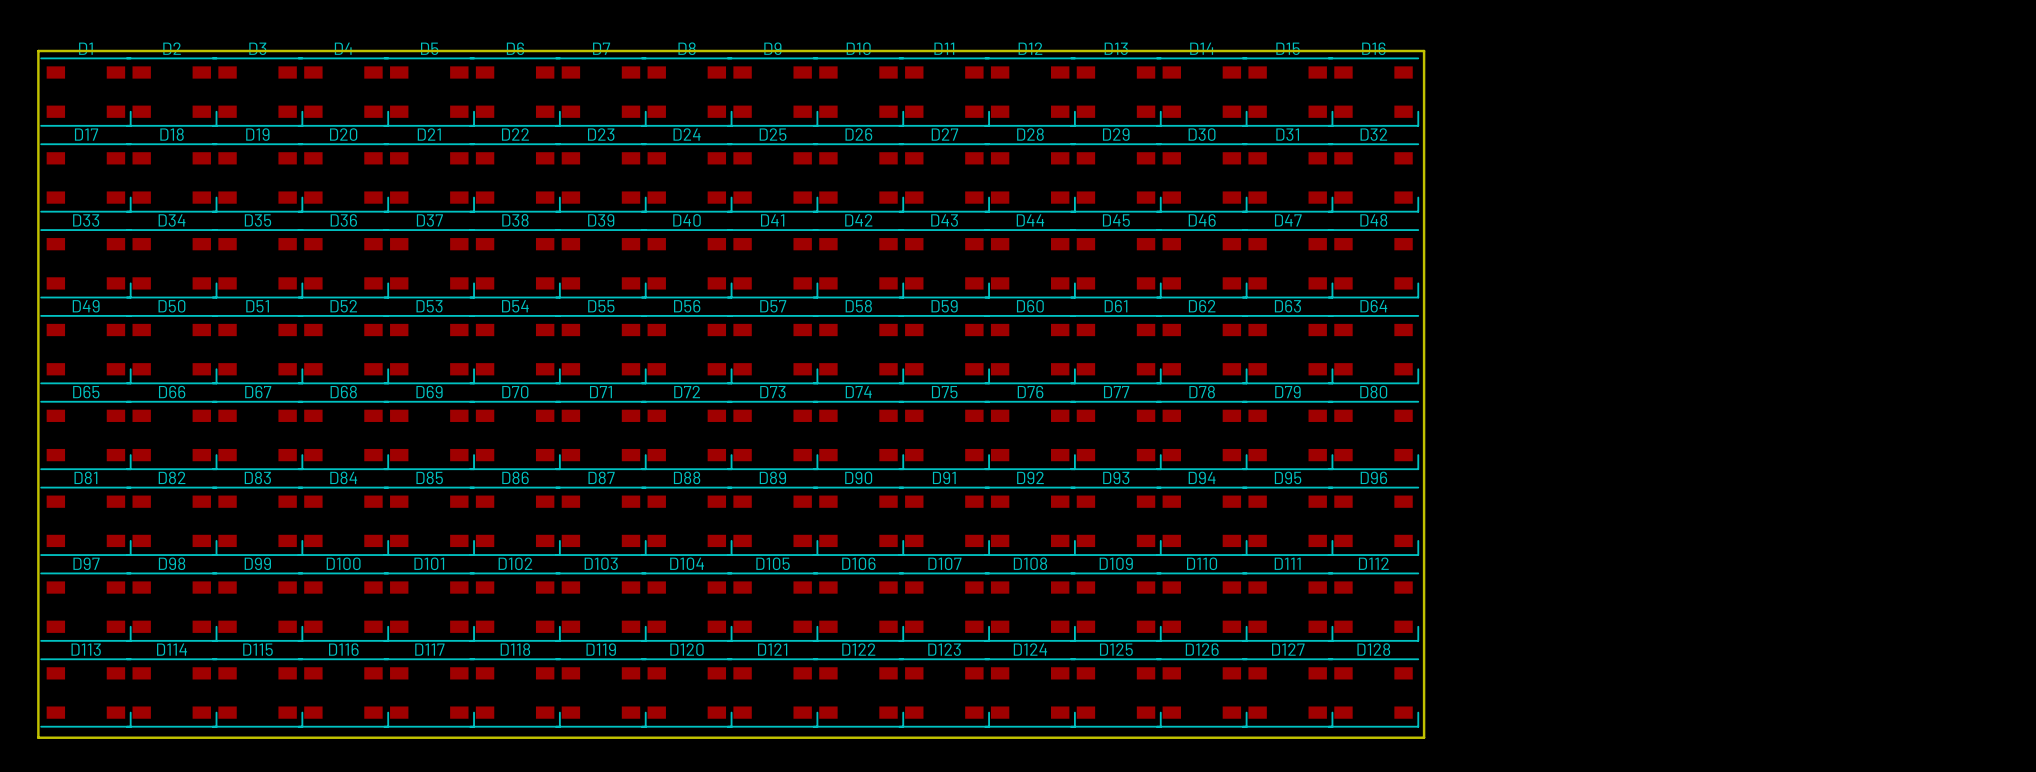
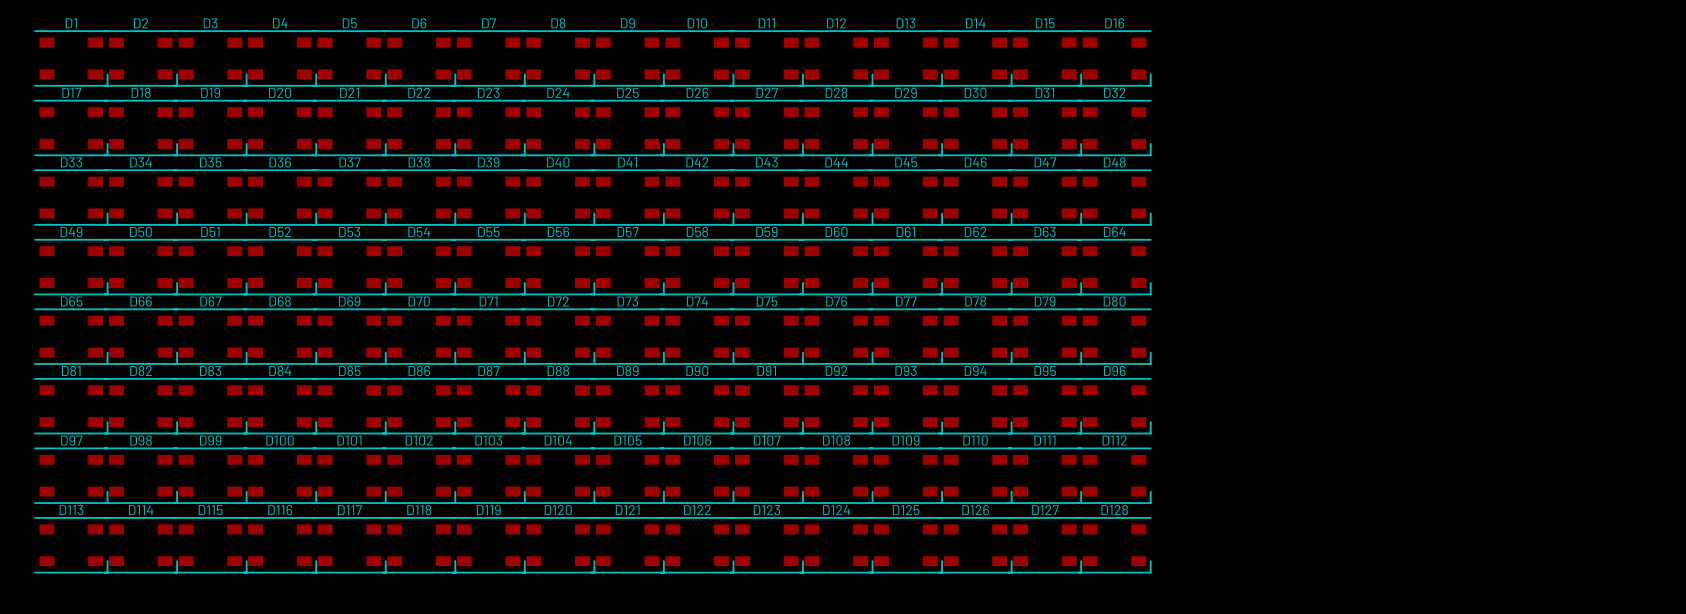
board edge: (38, 51) (1424, 51) (1424, 737) (38, 737) (38, 51) -> none

